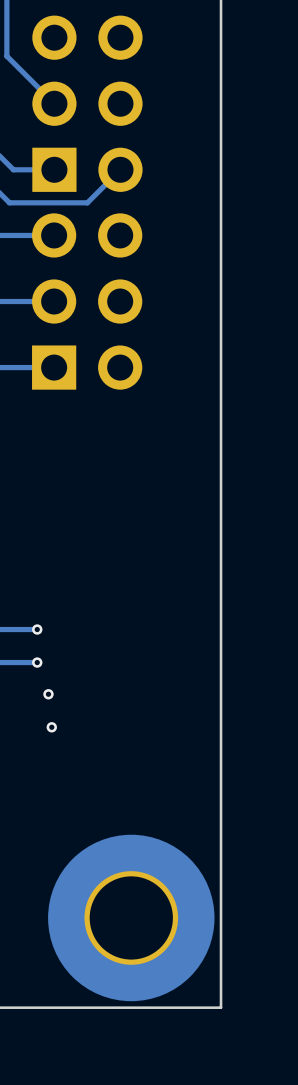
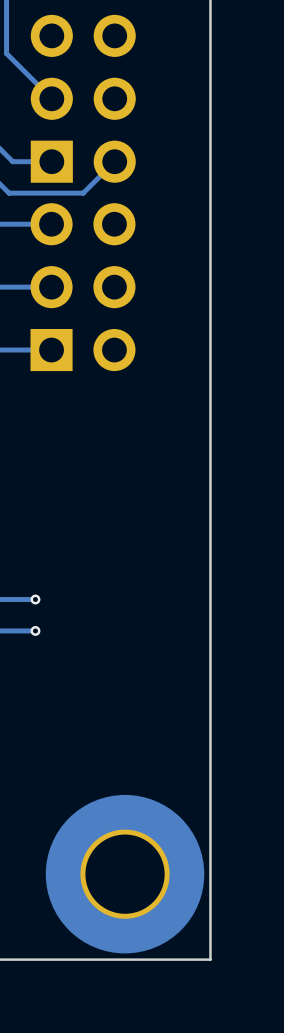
via: (48, 694) -> none
via: (51, 727) -> none

